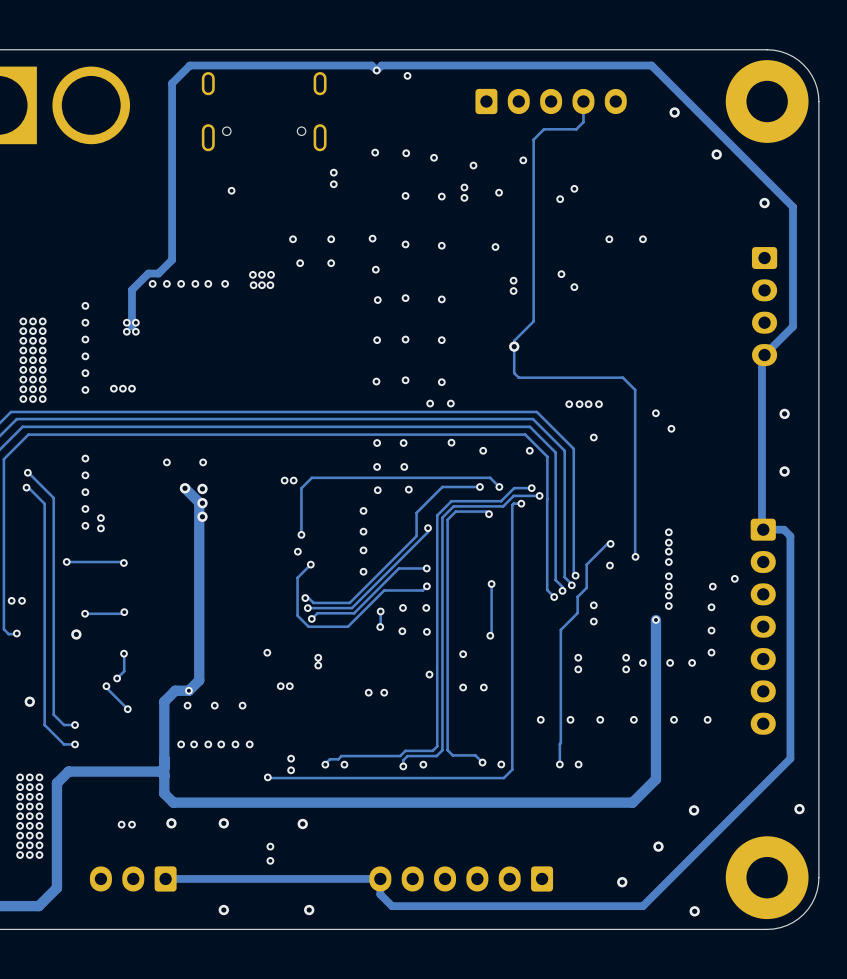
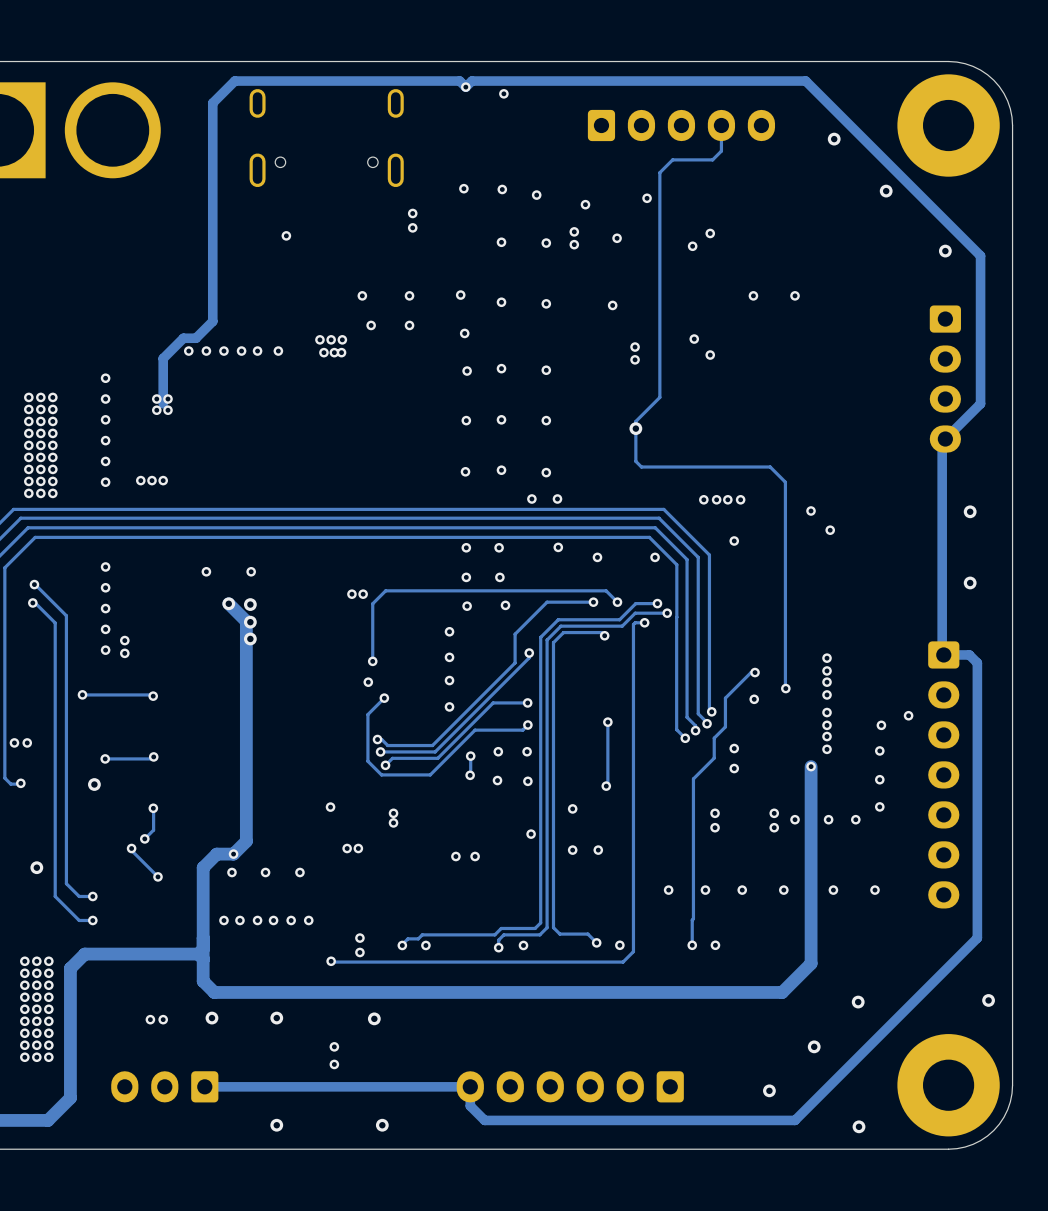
via: (252, 274) -> none
via: none -> (319, 339)
via: (261, 274) -> none
via: none -> (331, 339)
via: (271, 274) -> none
via: none -> (342, 339)
via: (253, 285) -> none
via: none -> (341, 352)

